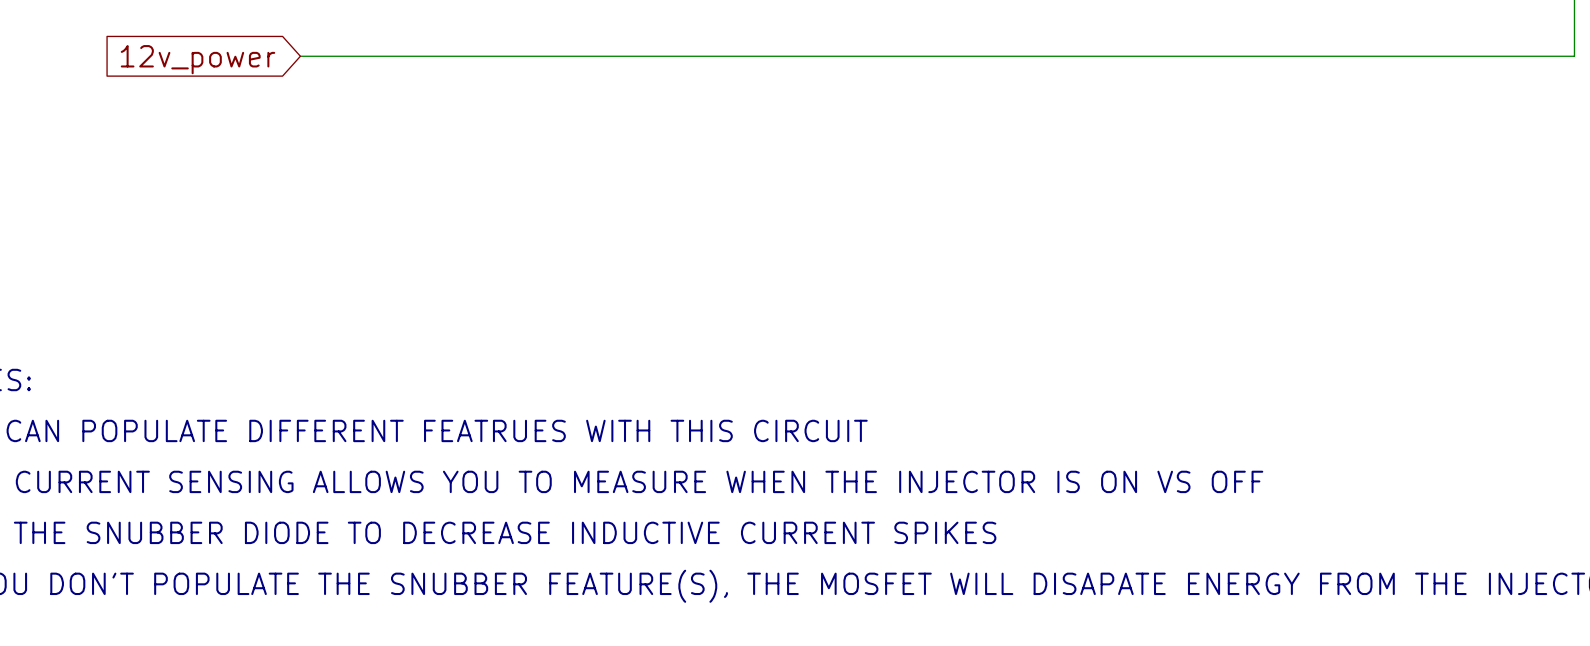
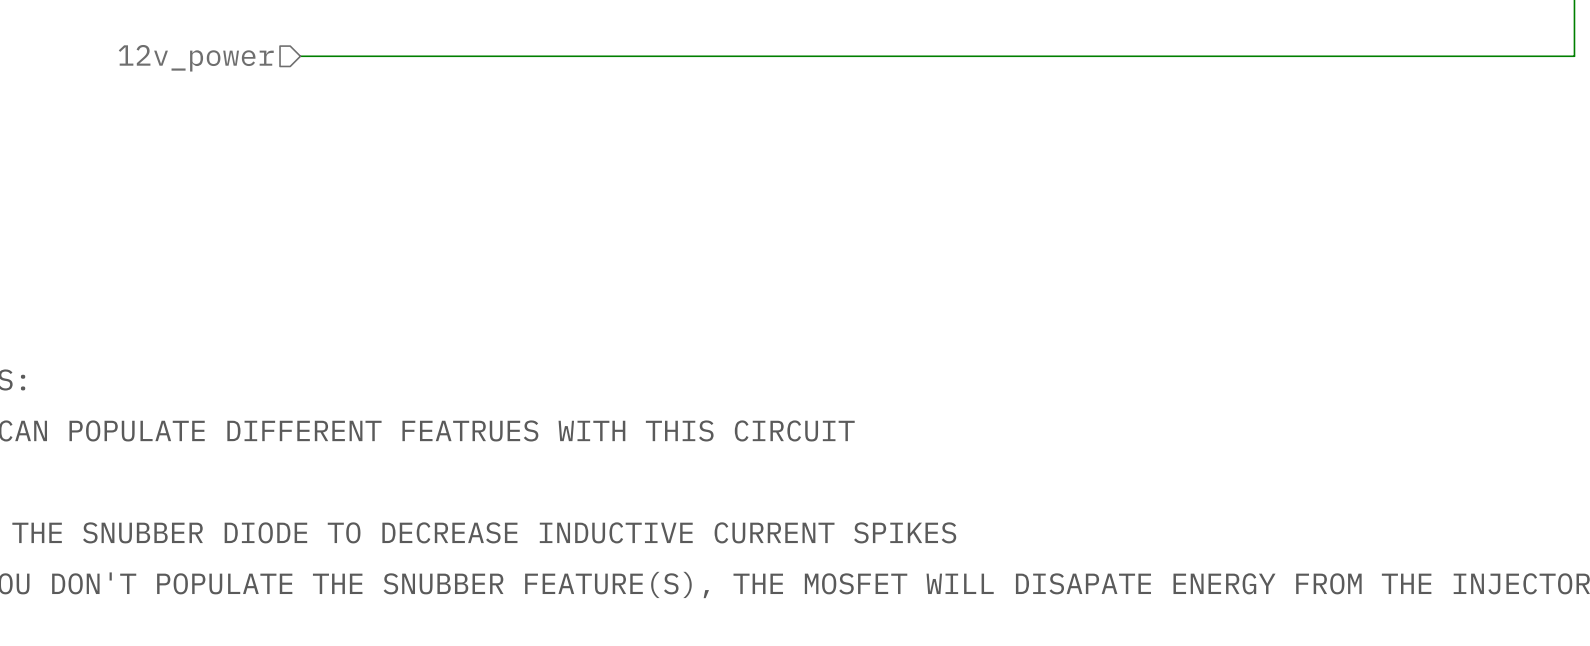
hierarchical label: none -> 12v_power (196, 58)
global label: 12v_power (197, 59) -> none
text: CURRENT SENSING ALLOWS YOU TO MEASURE WHEN THE INJECTOR IS ON VS OFF (639, 481) -> none

